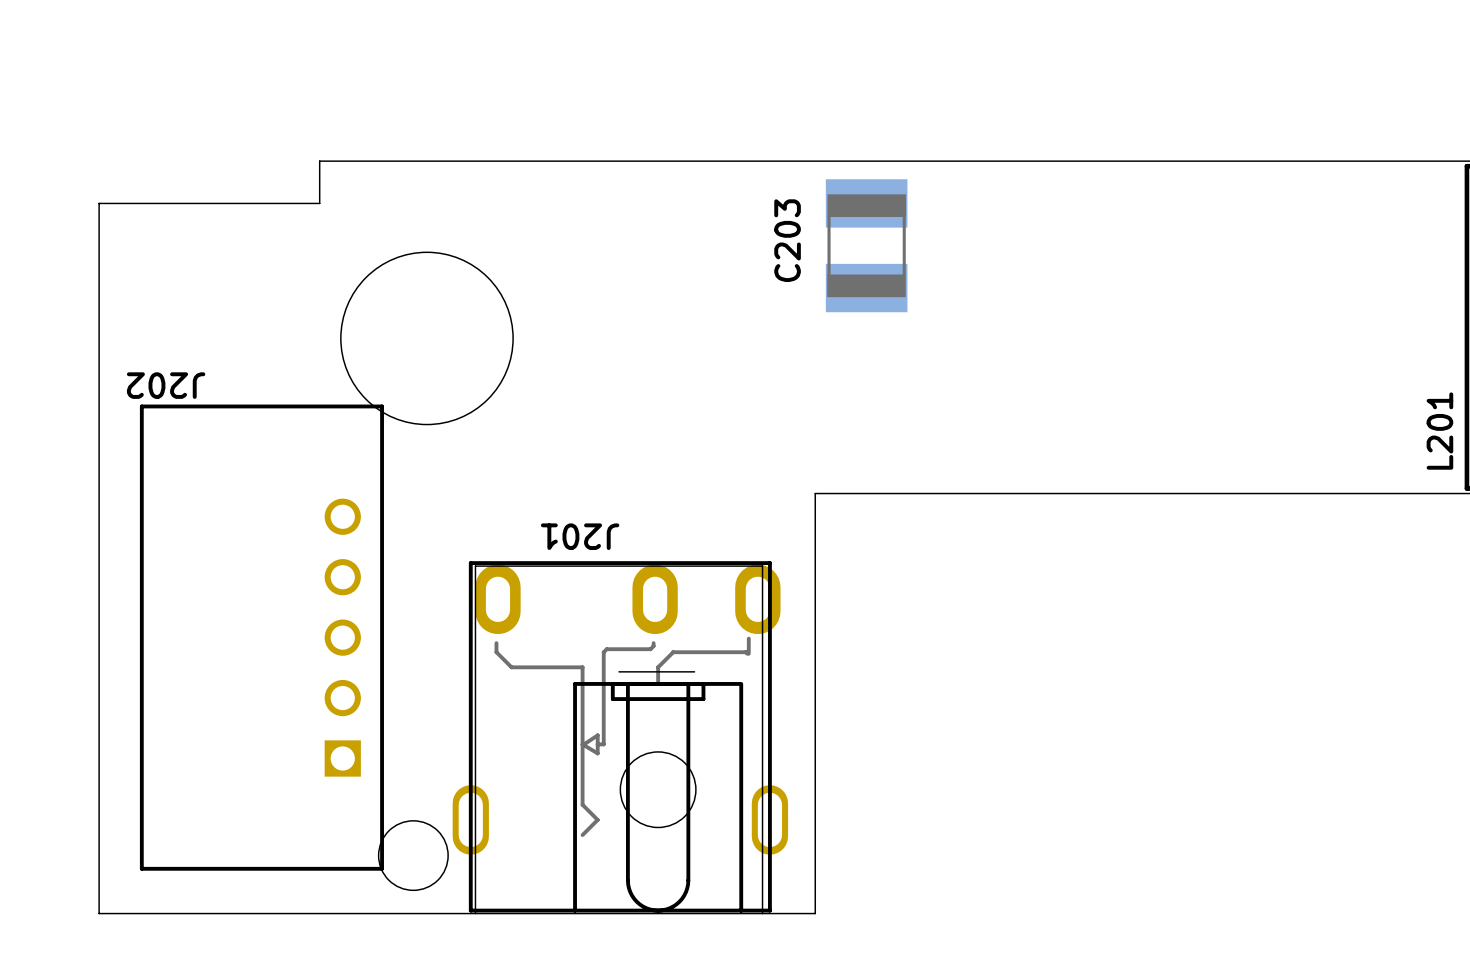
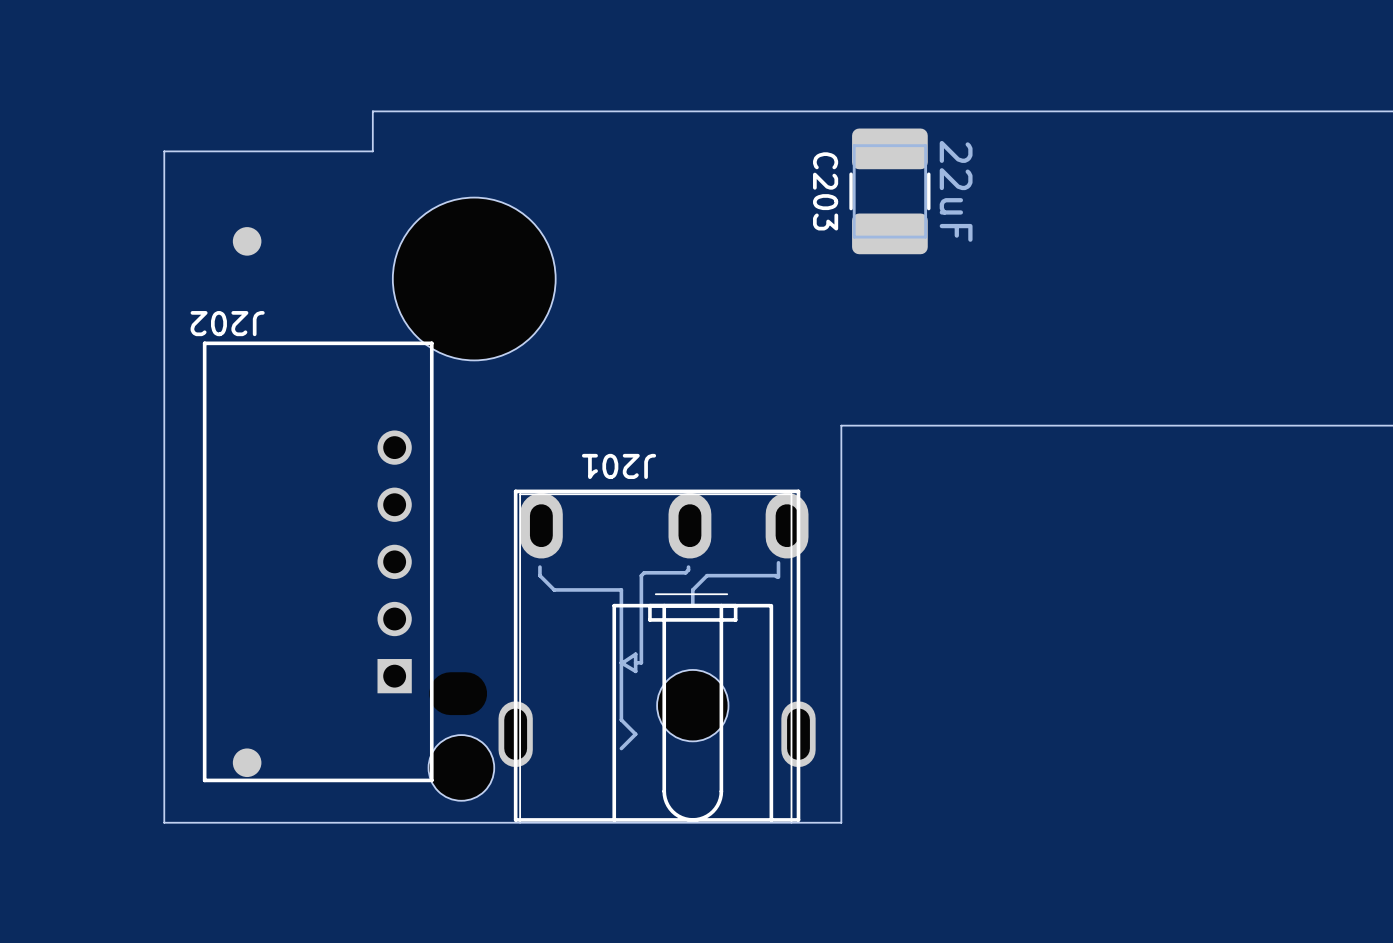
C203 footprint: [825, 179, 908, 313] -> [849, 128, 931, 255]
C203 value: none -> 22uF (956, 191)
part: none -> (247, 241)
part: none -> (247, 762)

